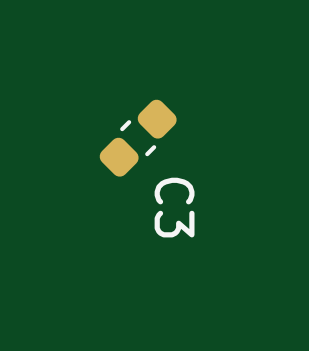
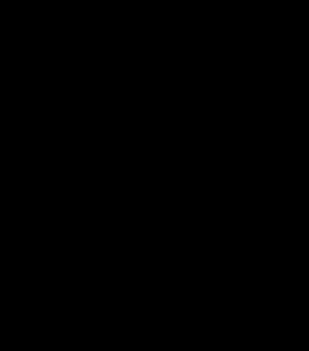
C3: (138, 138) -> none

